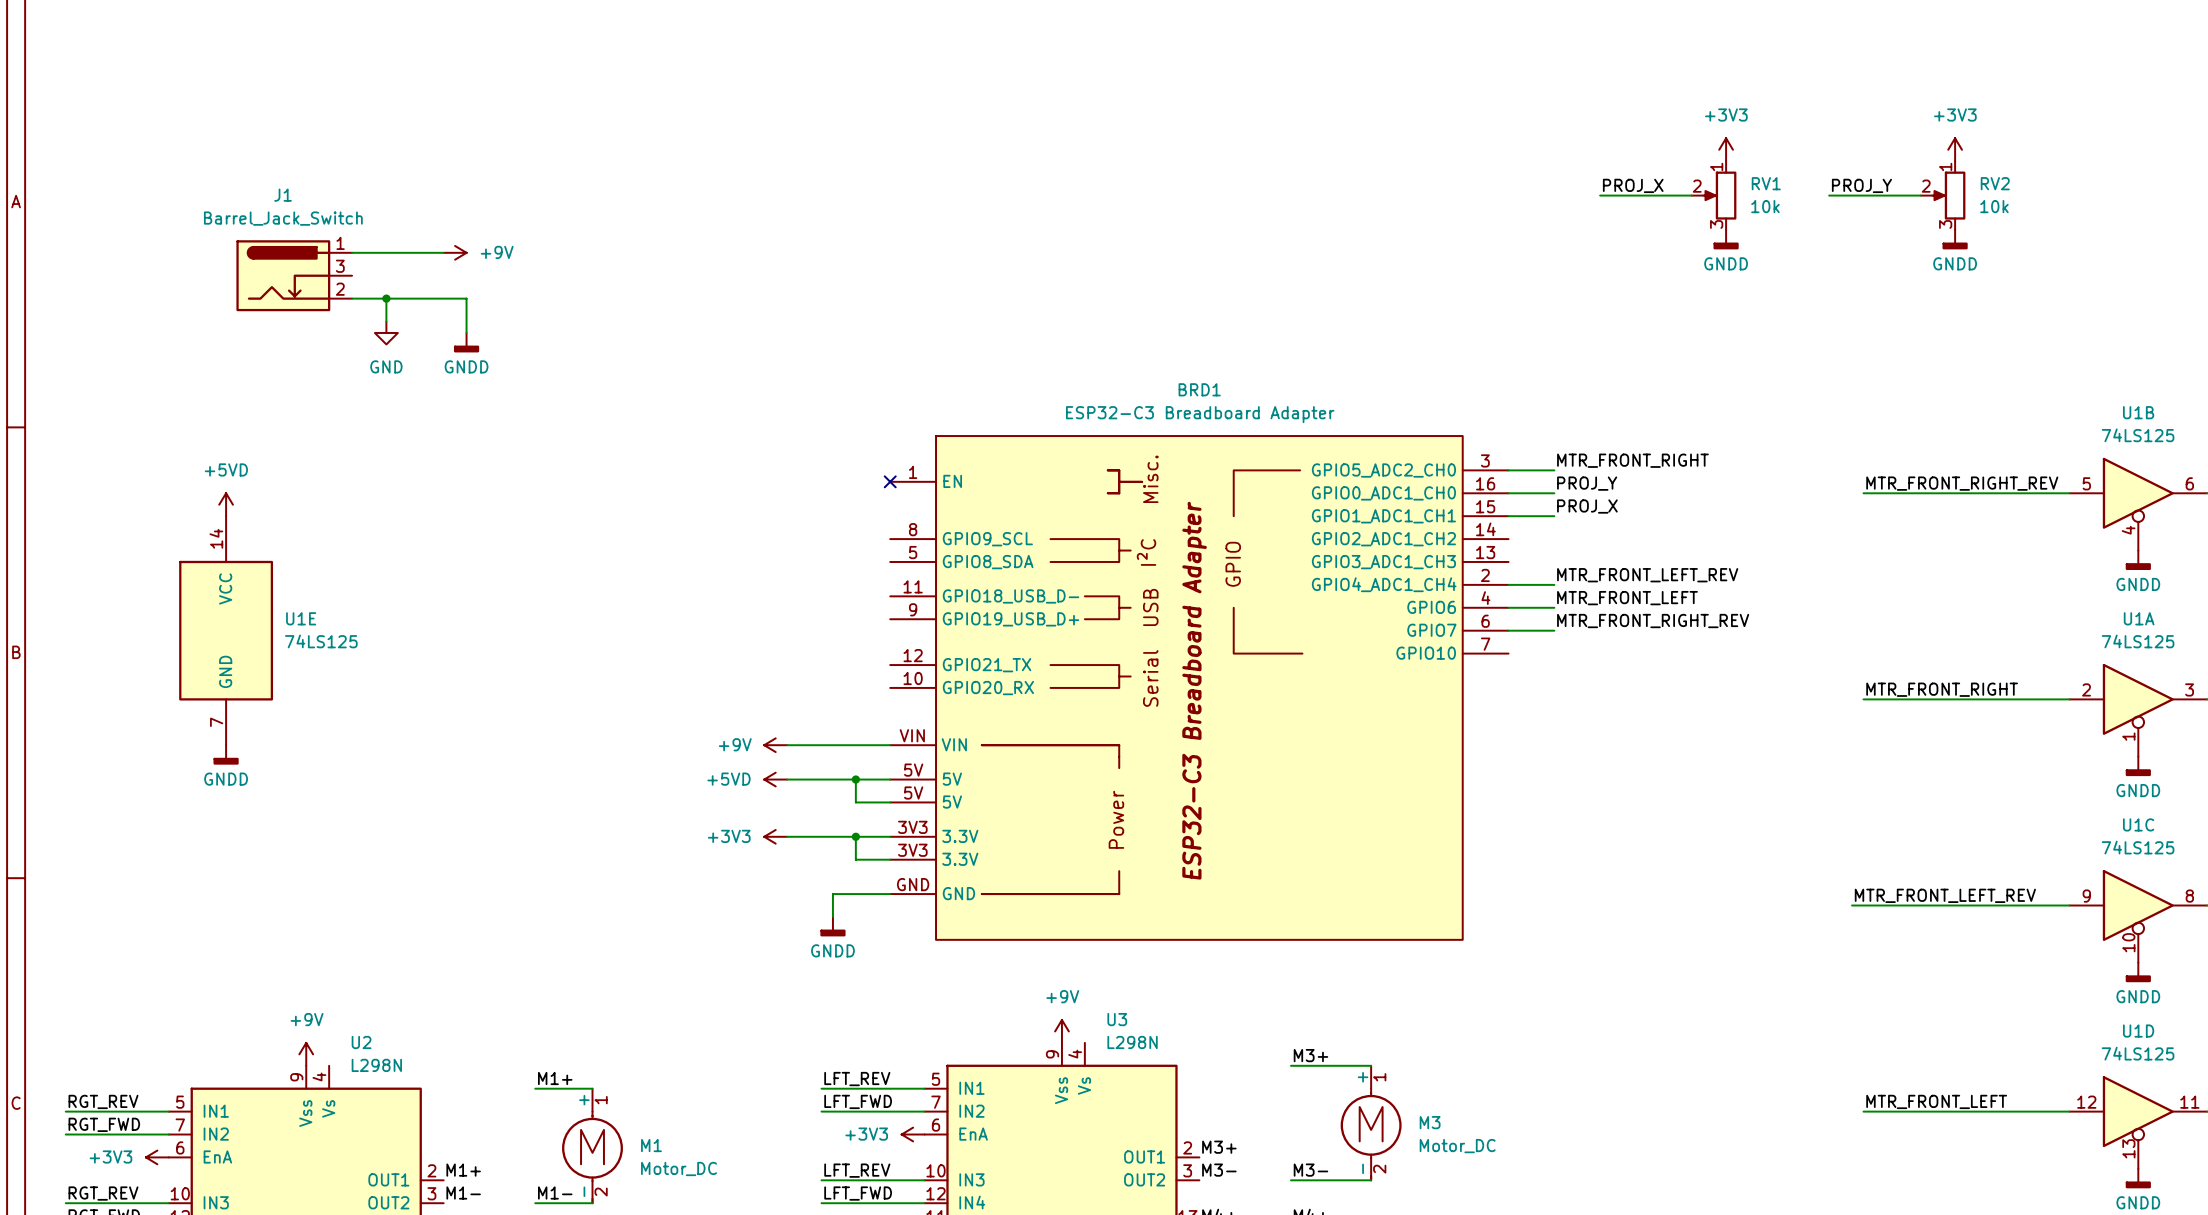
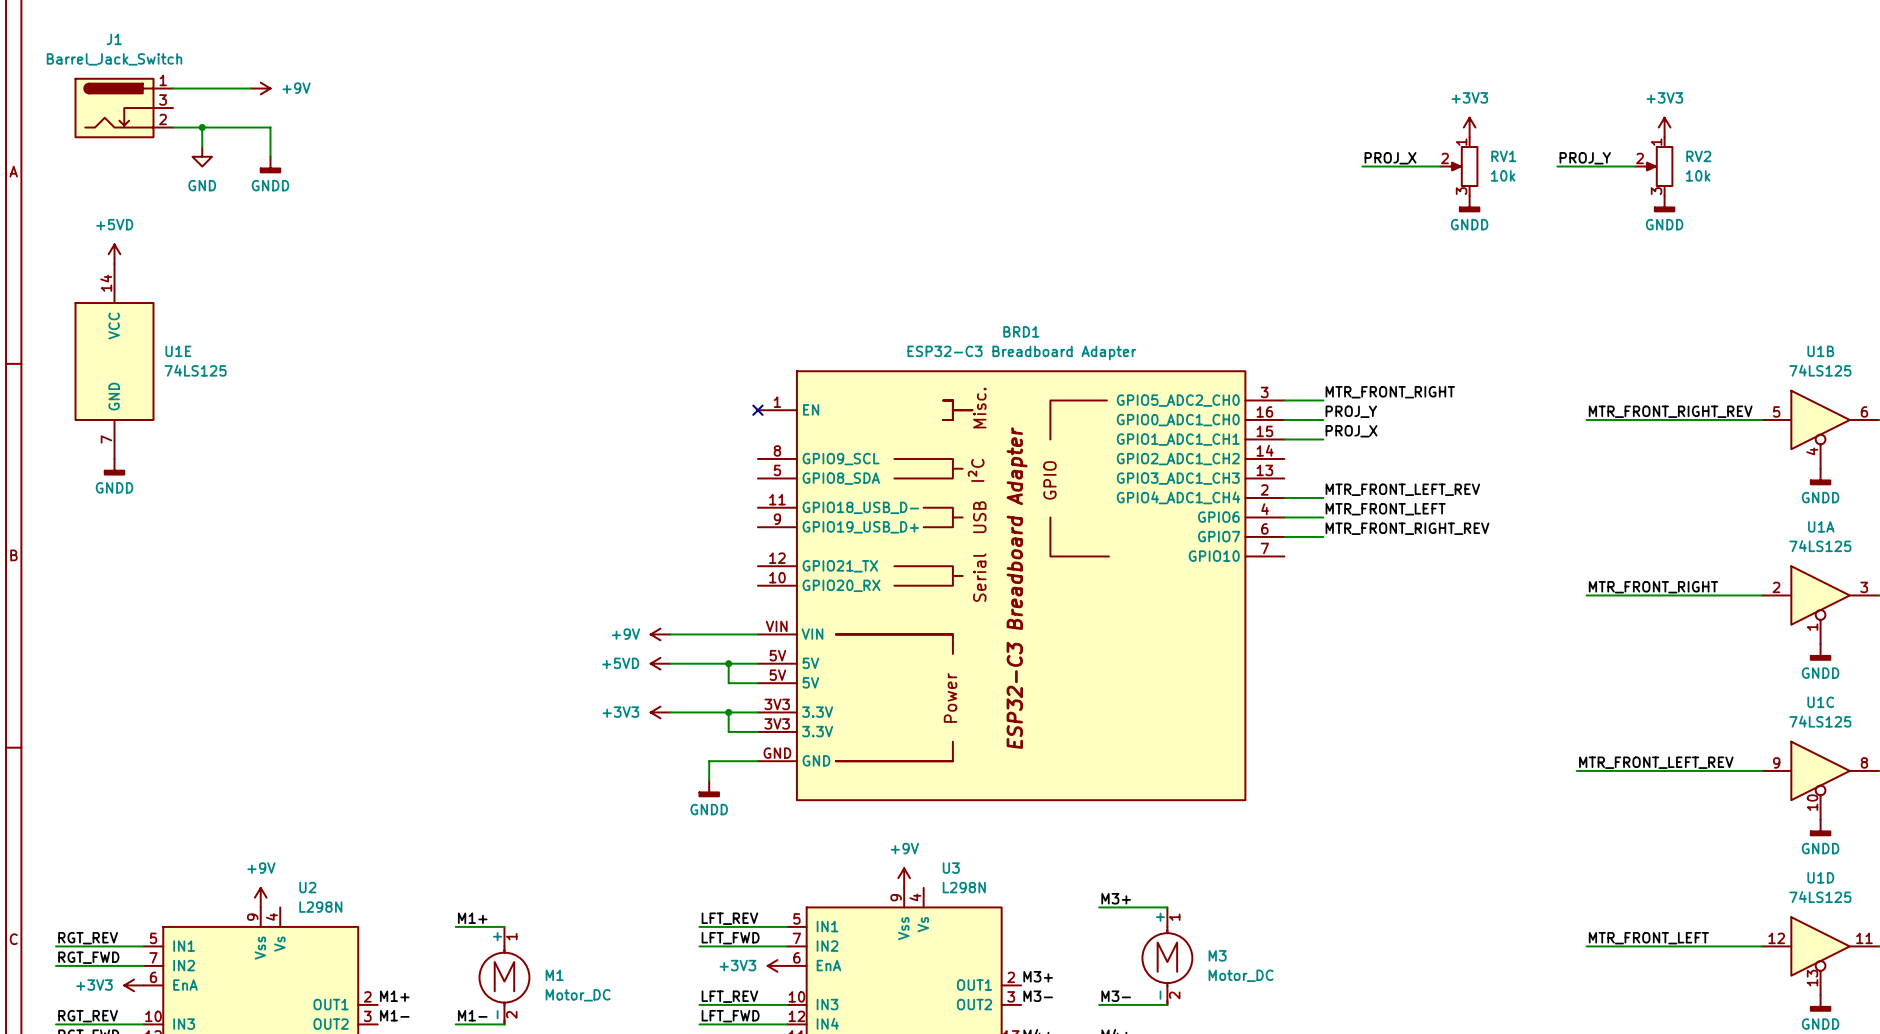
junction: none -> (202, 127)
power symbol: none -> GNDD (270, 165)
wire: (352, 252) (443, 252) -> (172, 88) (250, 88)
power symbol position: +9V (455, 252) -> +9V (260, 88)
J1 position: (294, 275) -> (123, 108)
power symbol: none -> +5VD (114, 254)
wire: (352, 298) (466, 298) (466, 332) -> (172, 127) (270, 127) (270, 156)
wire: (386, 298) (386, 321) -> (202, 127) (202, 147)
junction: (386, 298) -> none
power symbol position: GND (386, 332) -> GND (202, 156)
power symbol: GNDD (466, 342) -> none
power symbol: +5VD (226, 504) -> none
power symbol: none -> GNDD (114, 467)
U1E position: (226, 630) -> (114, 361)
power symbol: GNDD (226, 754) -> none

